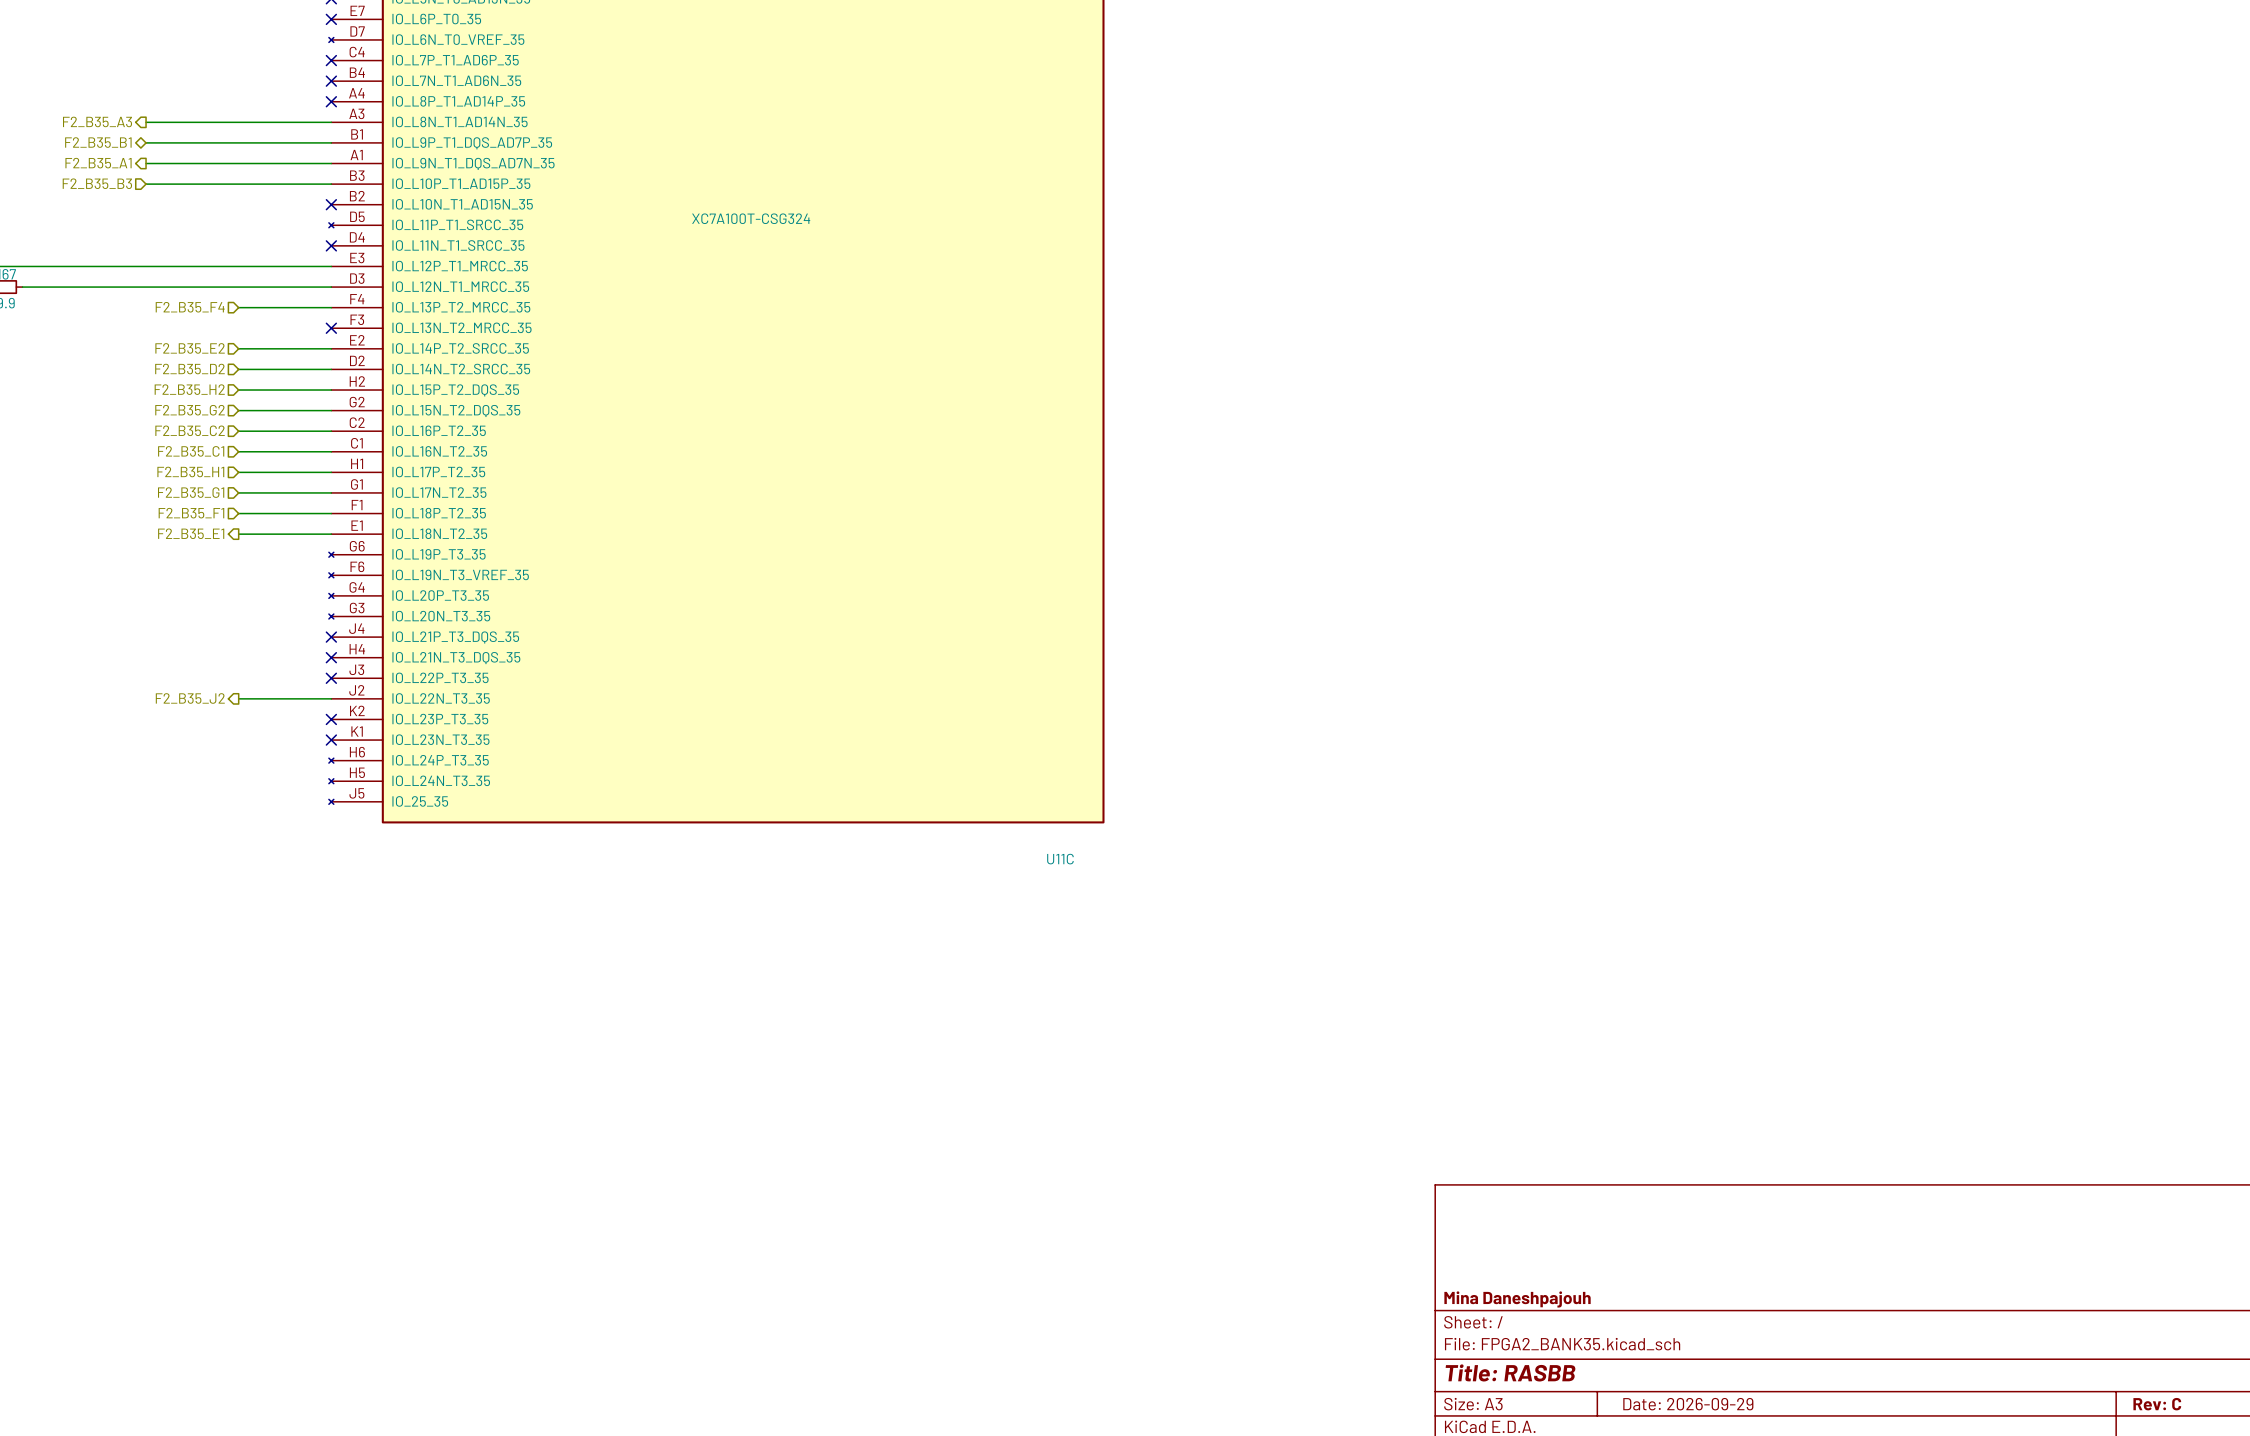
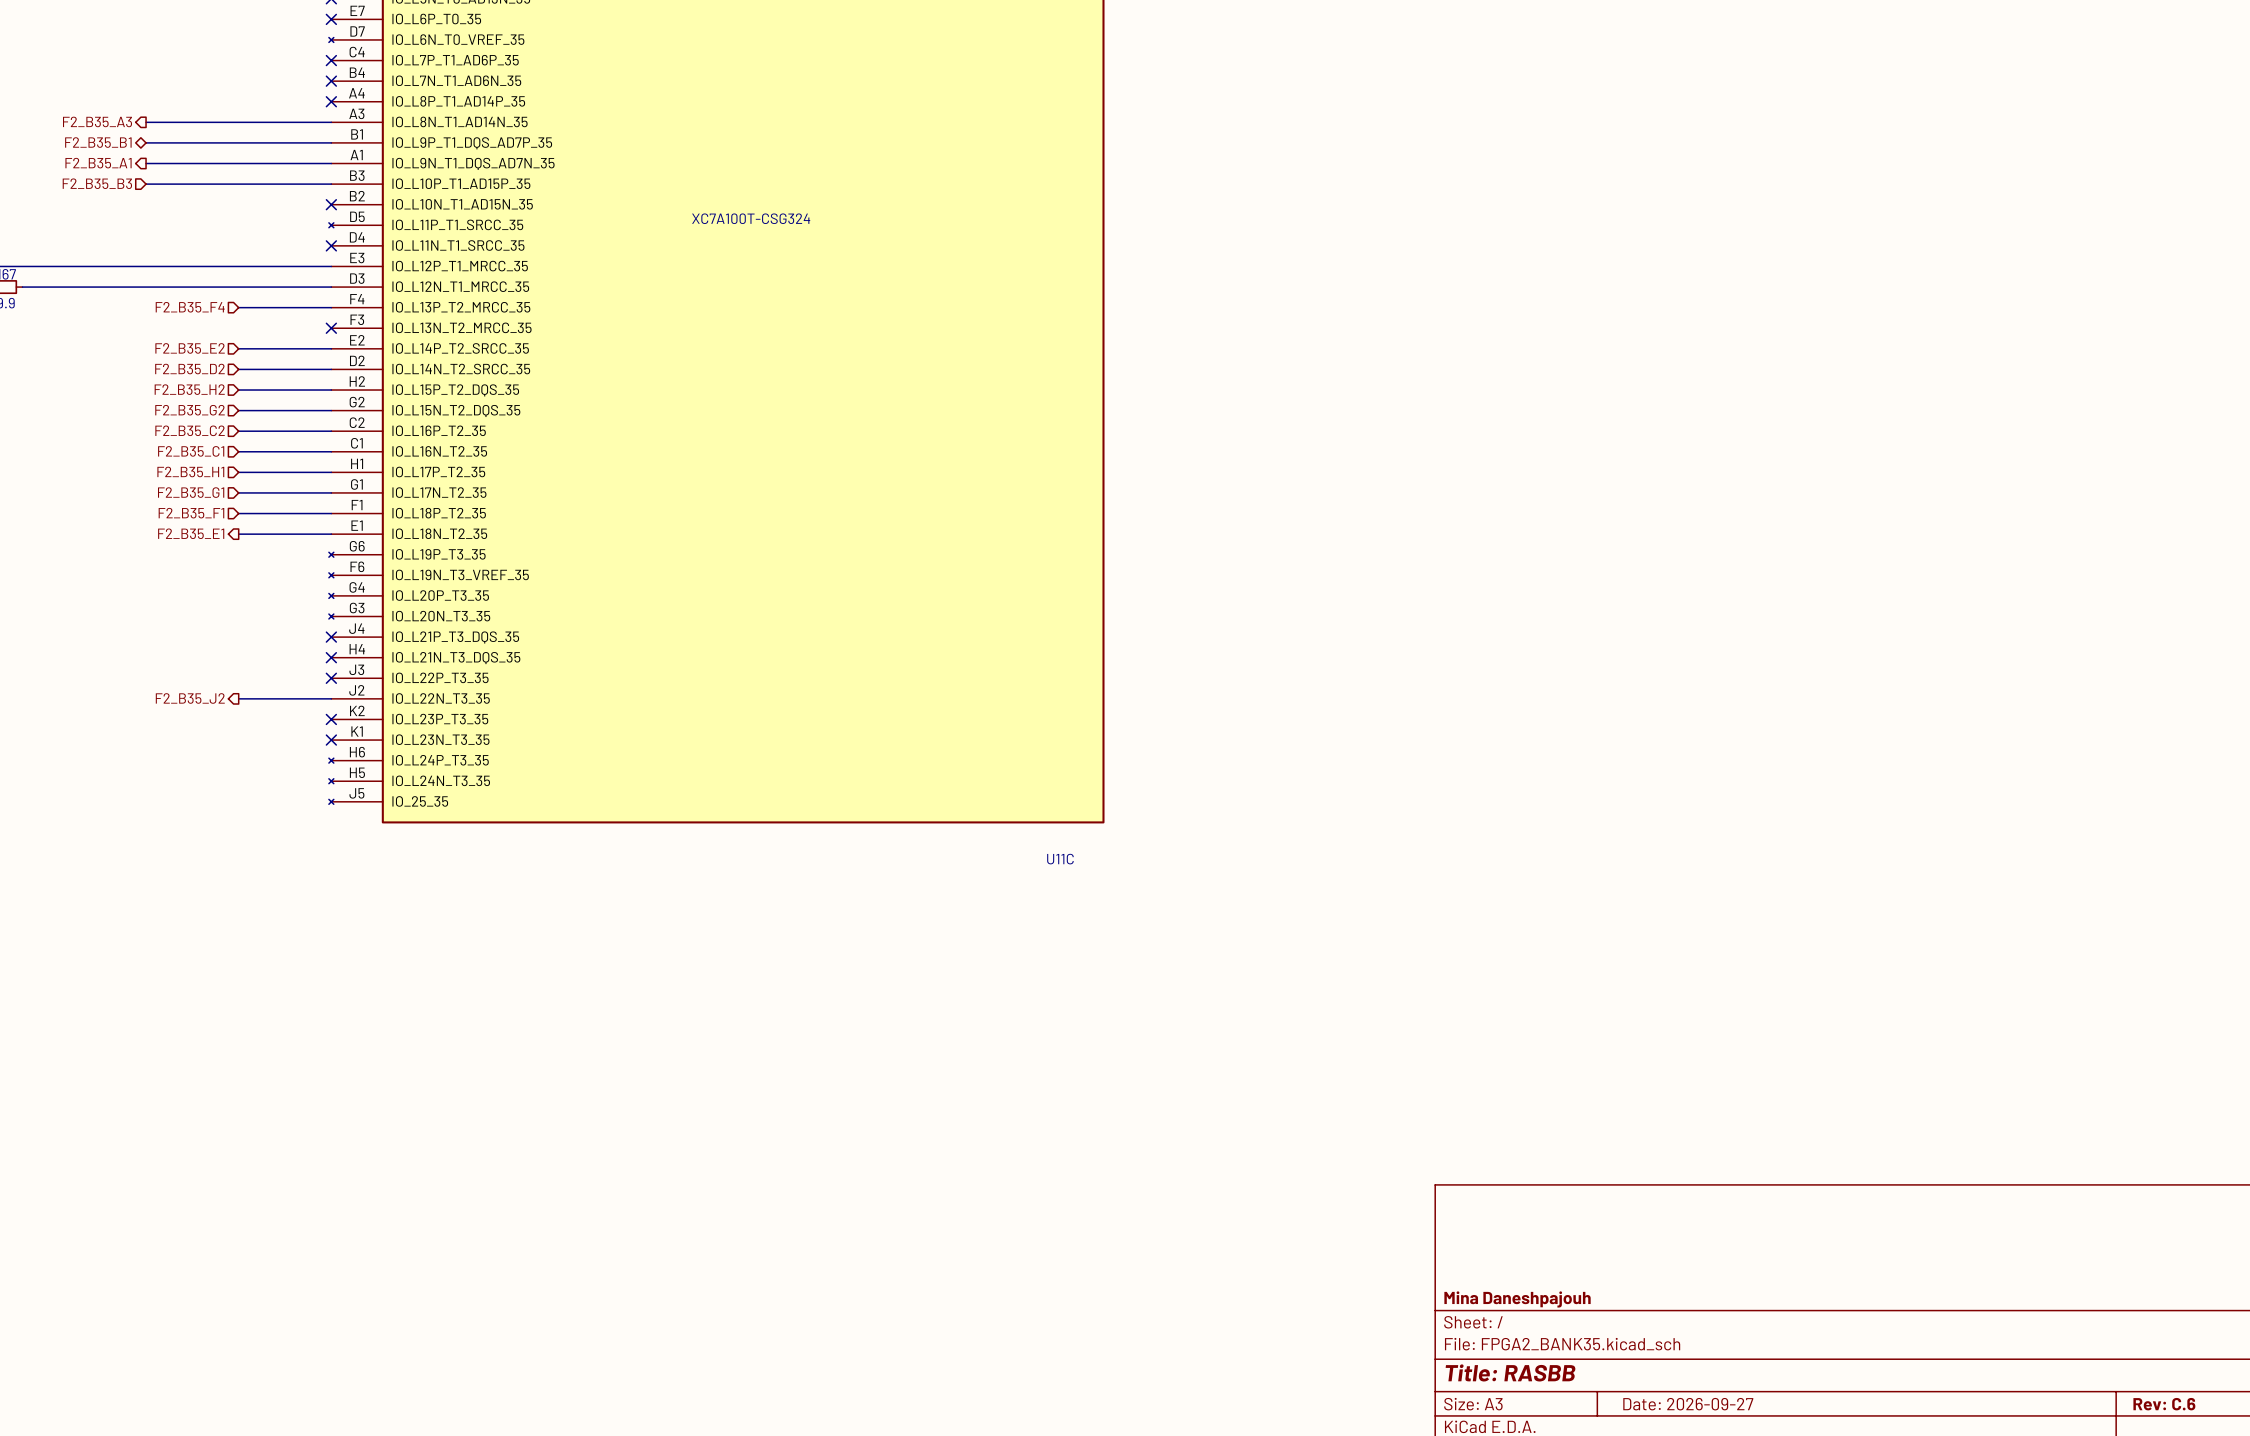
title block: Date: 2026-09-29 (1688, 1404) -> Date: 2026-09-27 (1688, 1404)
title block: Rev: C (2157, 1404) -> Rev: C.6 (2164, 1404)

